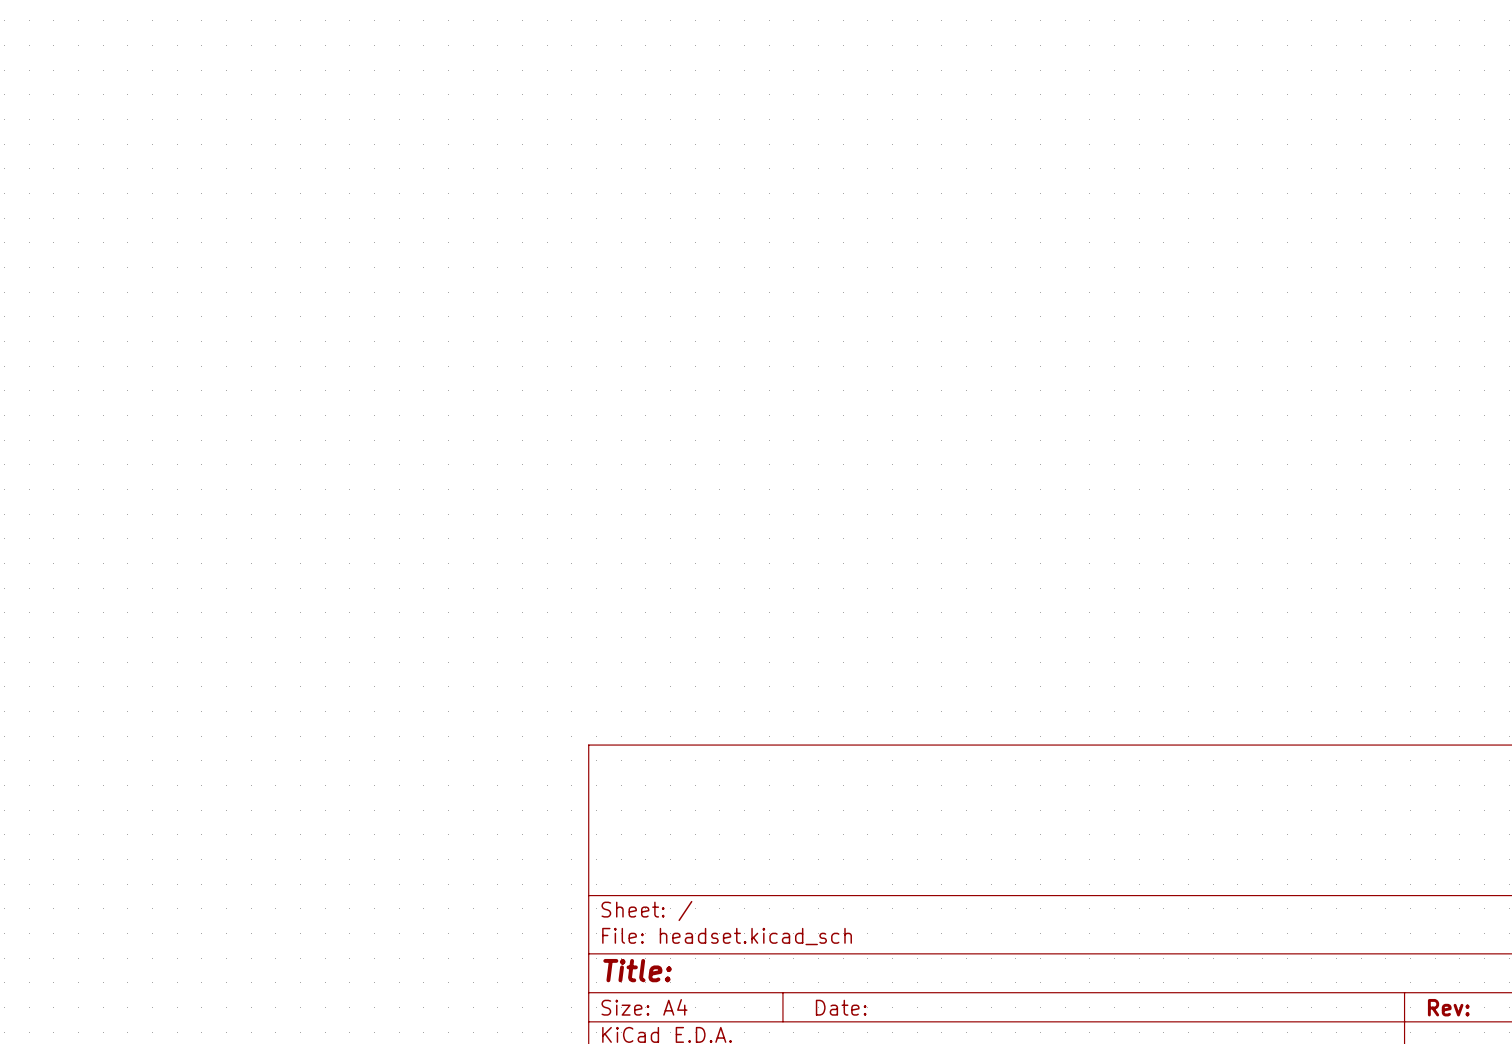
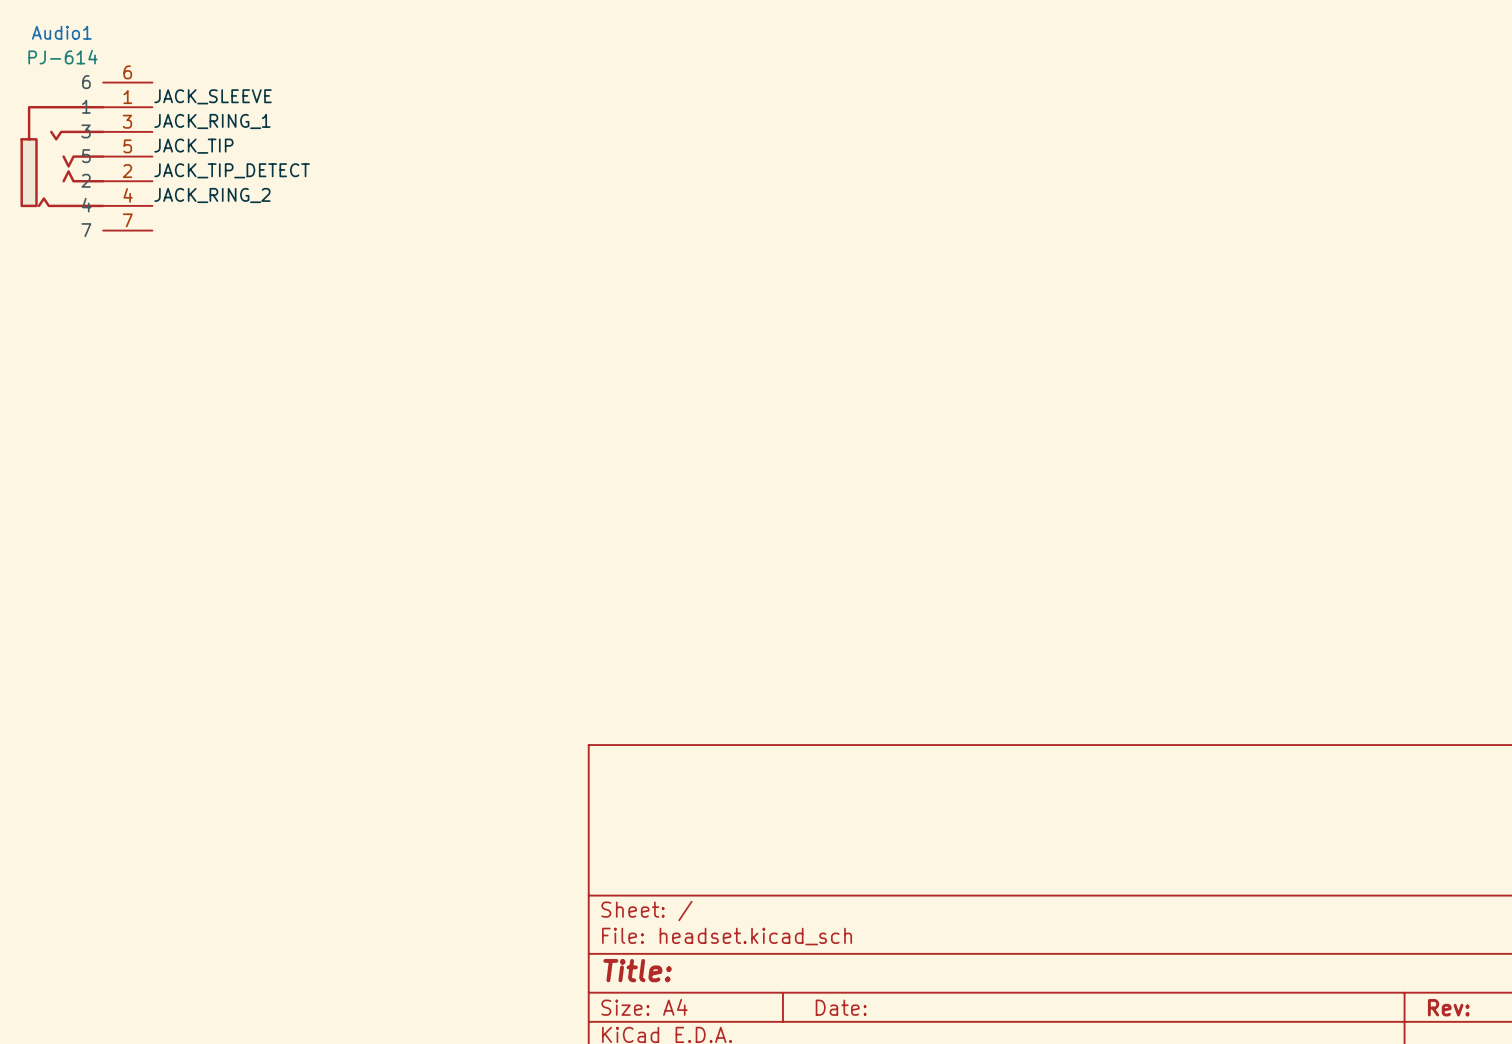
label: none -> JACK_SLEEVE (213, 96)
label: none -> JACK_RING_1 (212, 121)
label: none -> JACK_TIP (193, 146)
Audio1: none -> PJ-614 (86, 156)
label: none -> JACK_TIP_DETECT (232, 170)
label: none -> JACK_RING_2 (212, 195)

